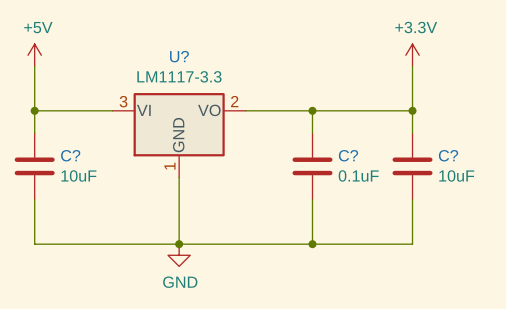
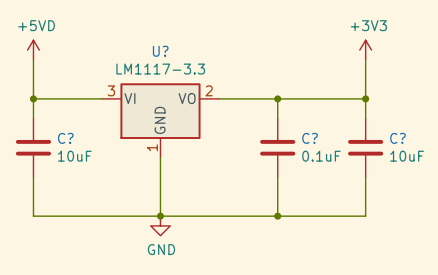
power symbol: +5V (34, 55) -> +5VD (33, 50)
power symbol: +3.3V (412, 55) -> +3V3 (365, 50)

